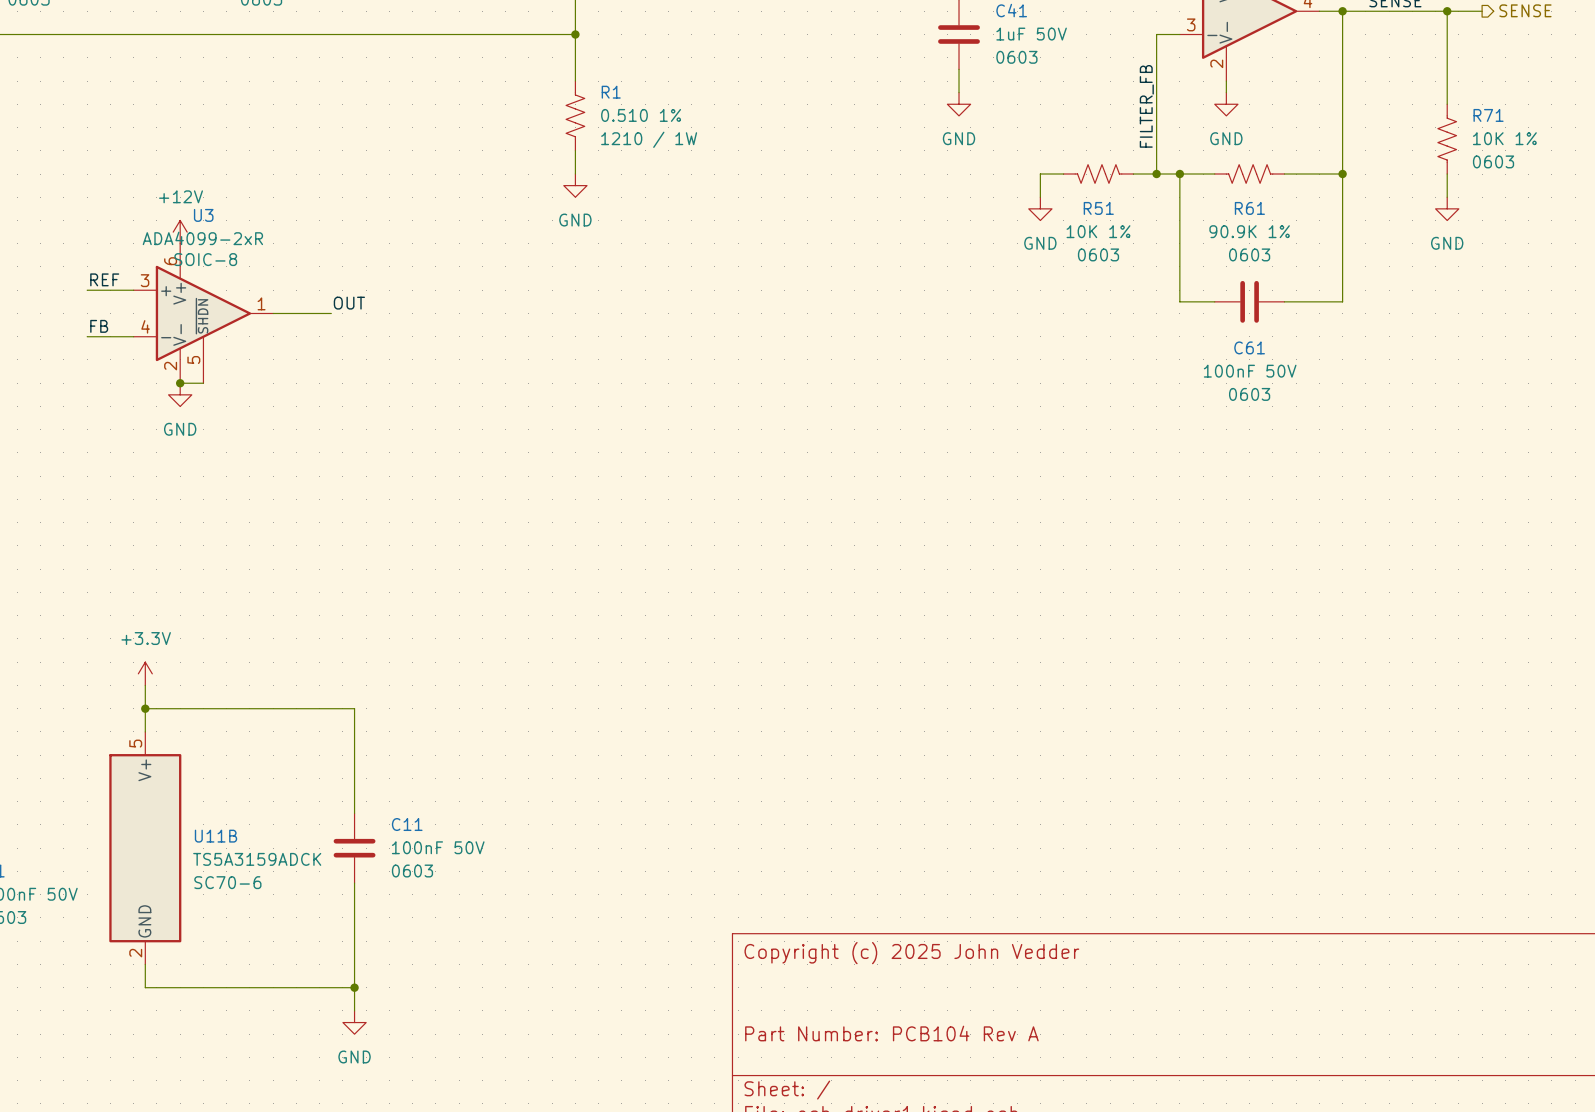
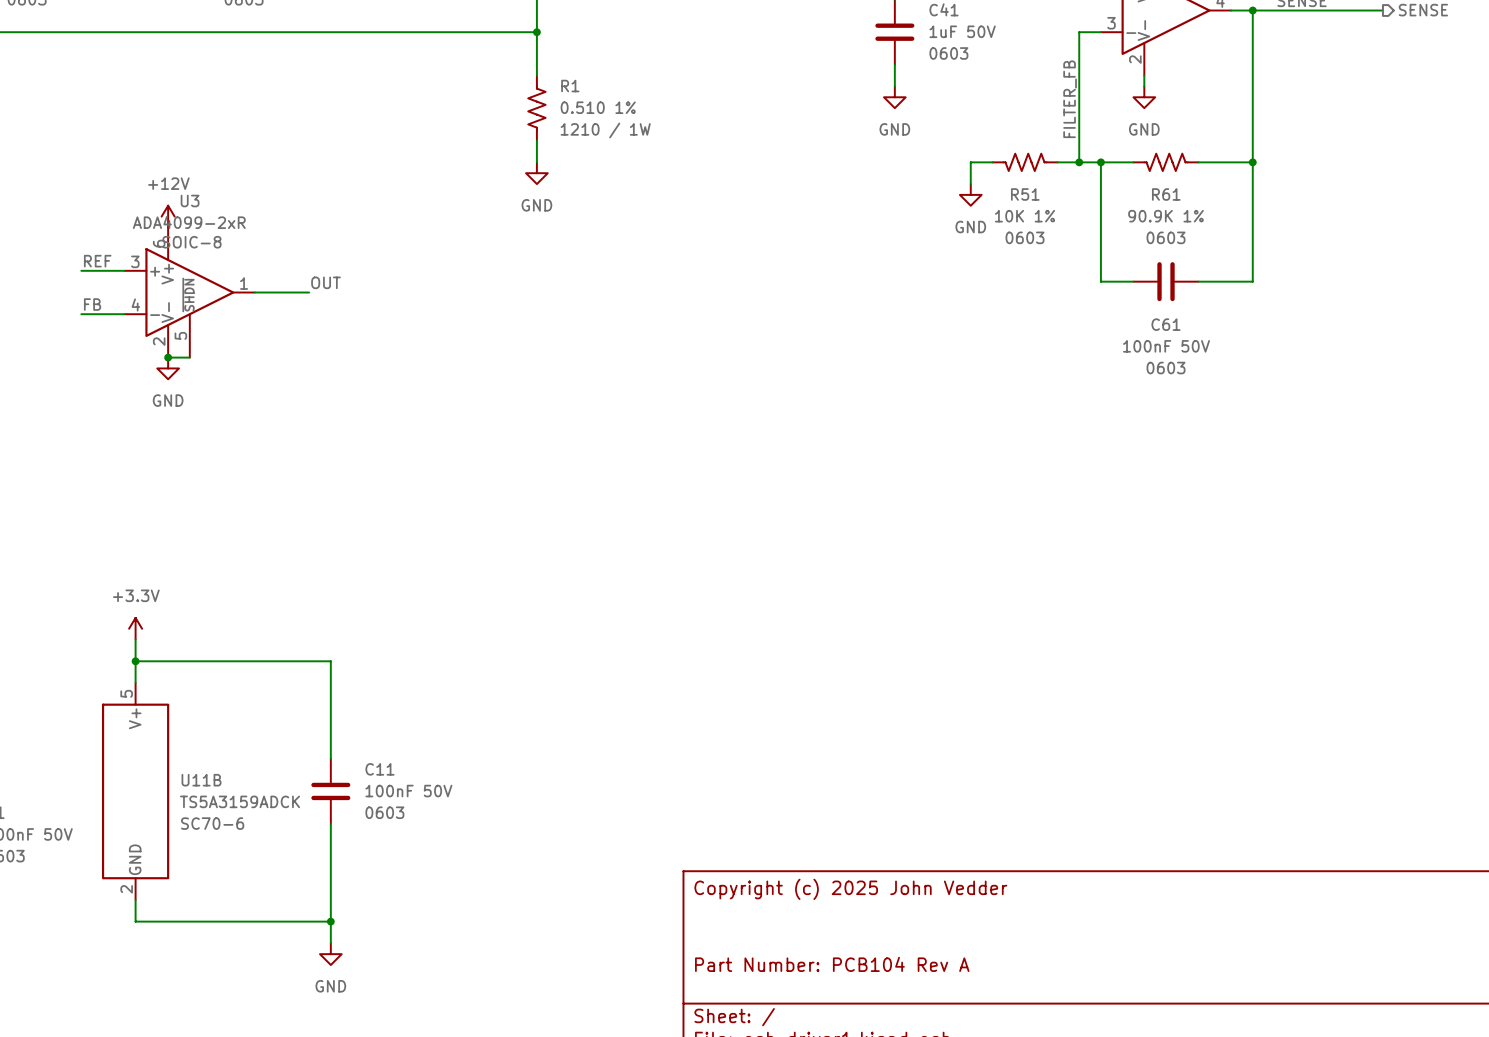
wire: (1447, 11) (1447, 104) -> none
junction: (1447, 11) -> none
R71: 10K 1% (1447, 139) -> none
wire: (1447, 174) (1447, 197) -> none
power symbol: GND (1447, 208) -> none

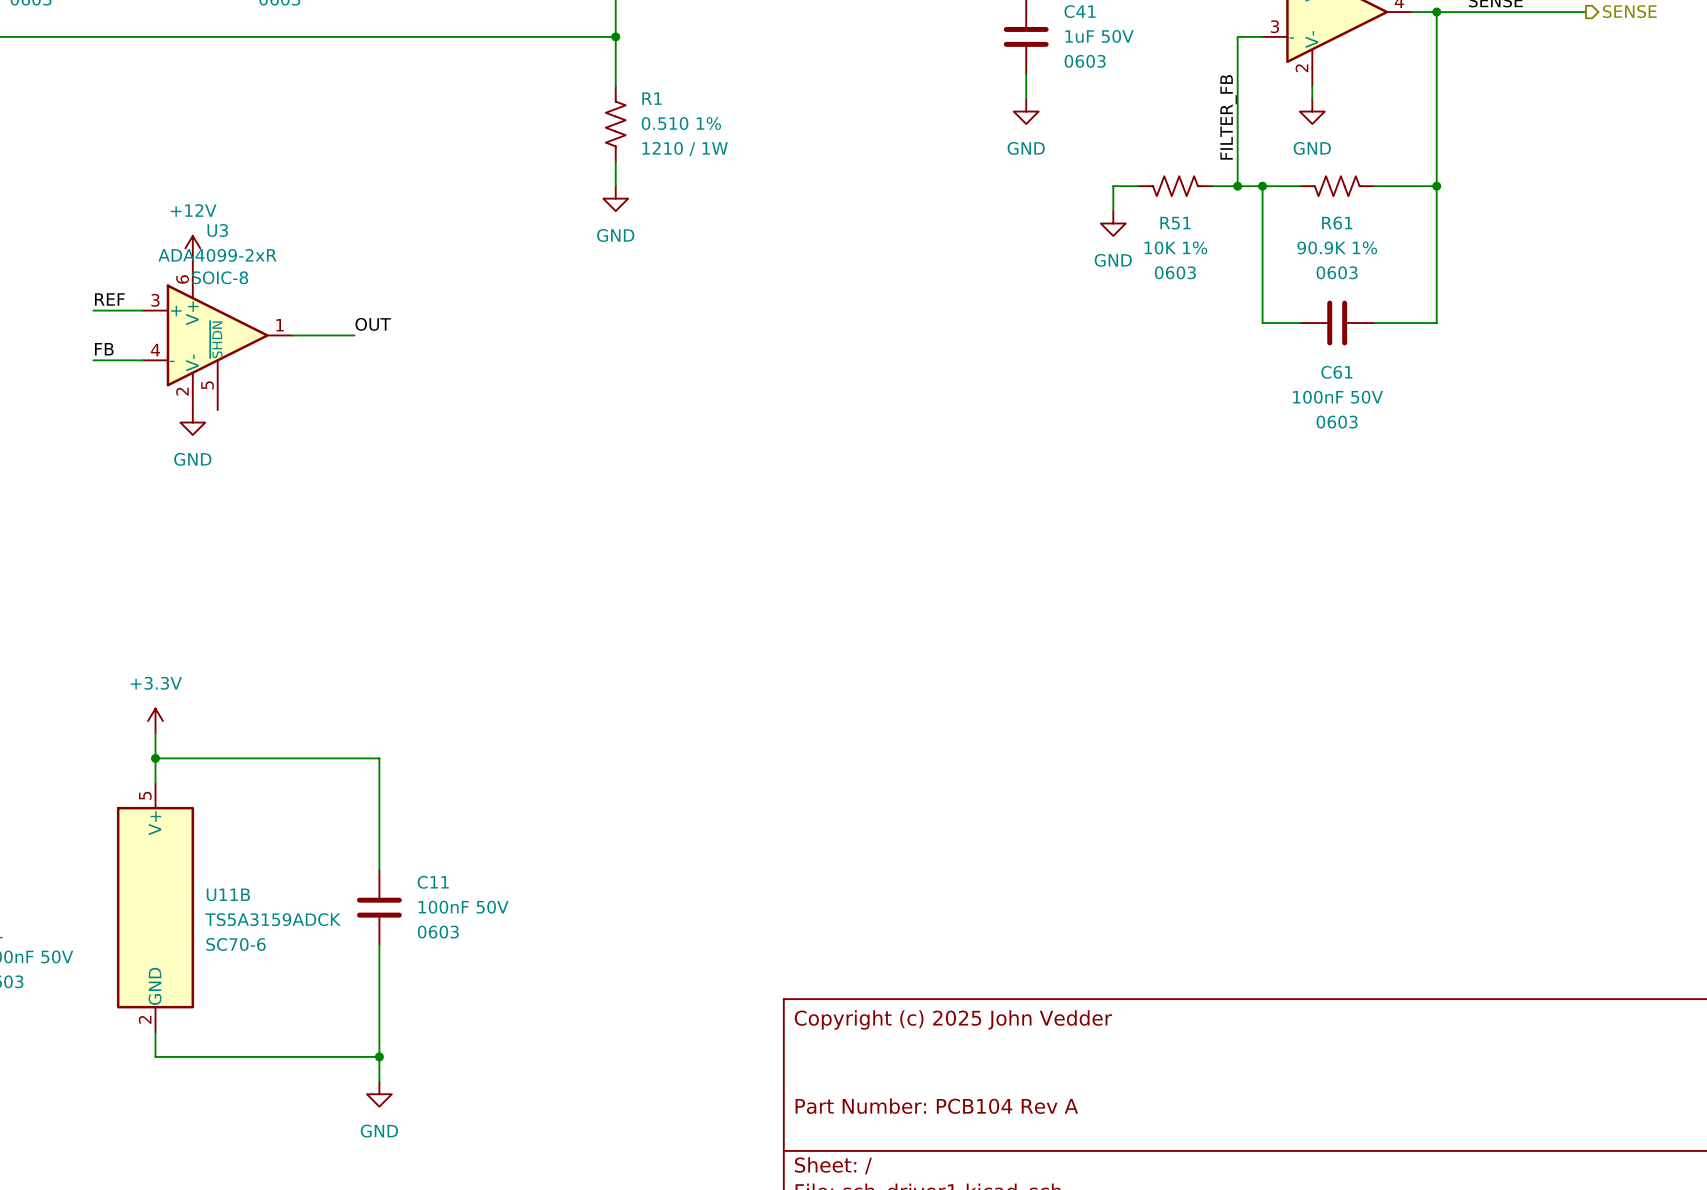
wire: (168, 357) (189, 357) -> none
junction: (168, 357) -> none

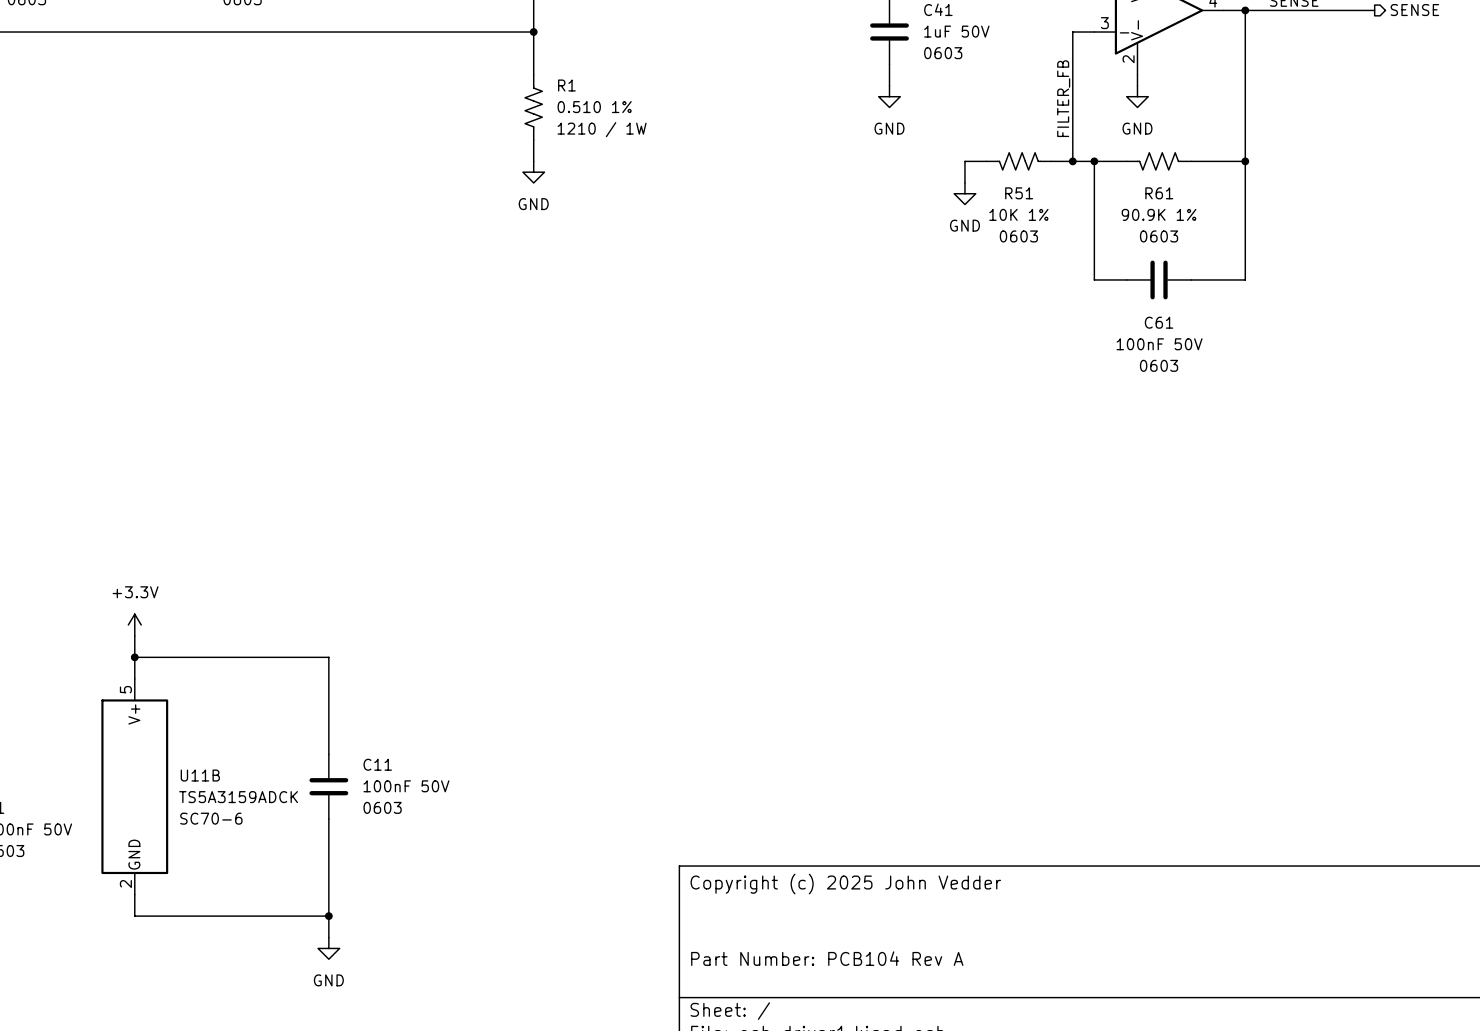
power symbol: +12V (192, 248) -> none
label: REF (109, 299) -> none
wire: (93, 310) (143, 310) -> none
label: OUT (373, 324) -> none
U3: ADA4099-2xR (217, 335) -> none
wire: (292, 335) (354, 335) -> none
label: FB (104, 349) -> none
wire: (93, 360) (143, 360) -> none
power symbol: GND (192, 422) -> none

